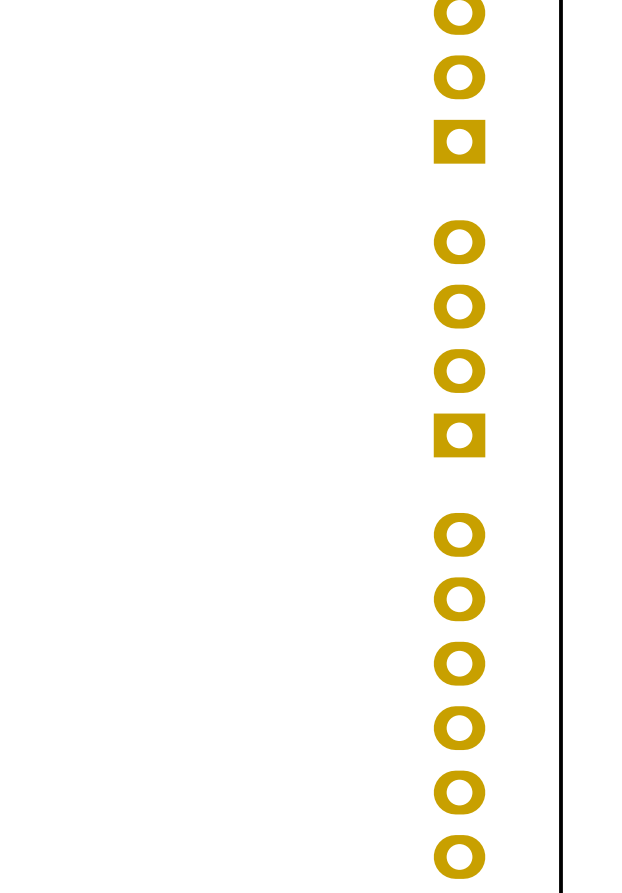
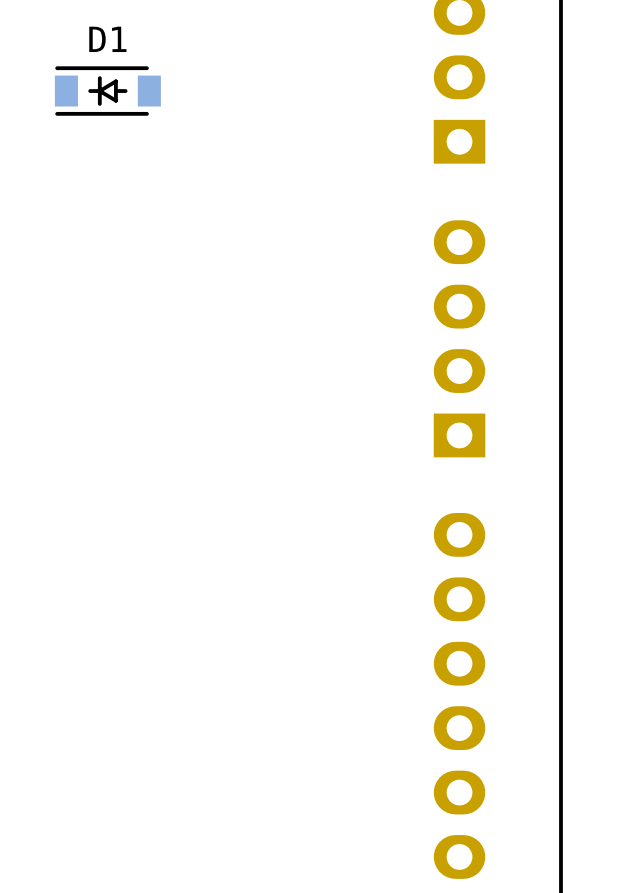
D1: none -> (107, 91)

